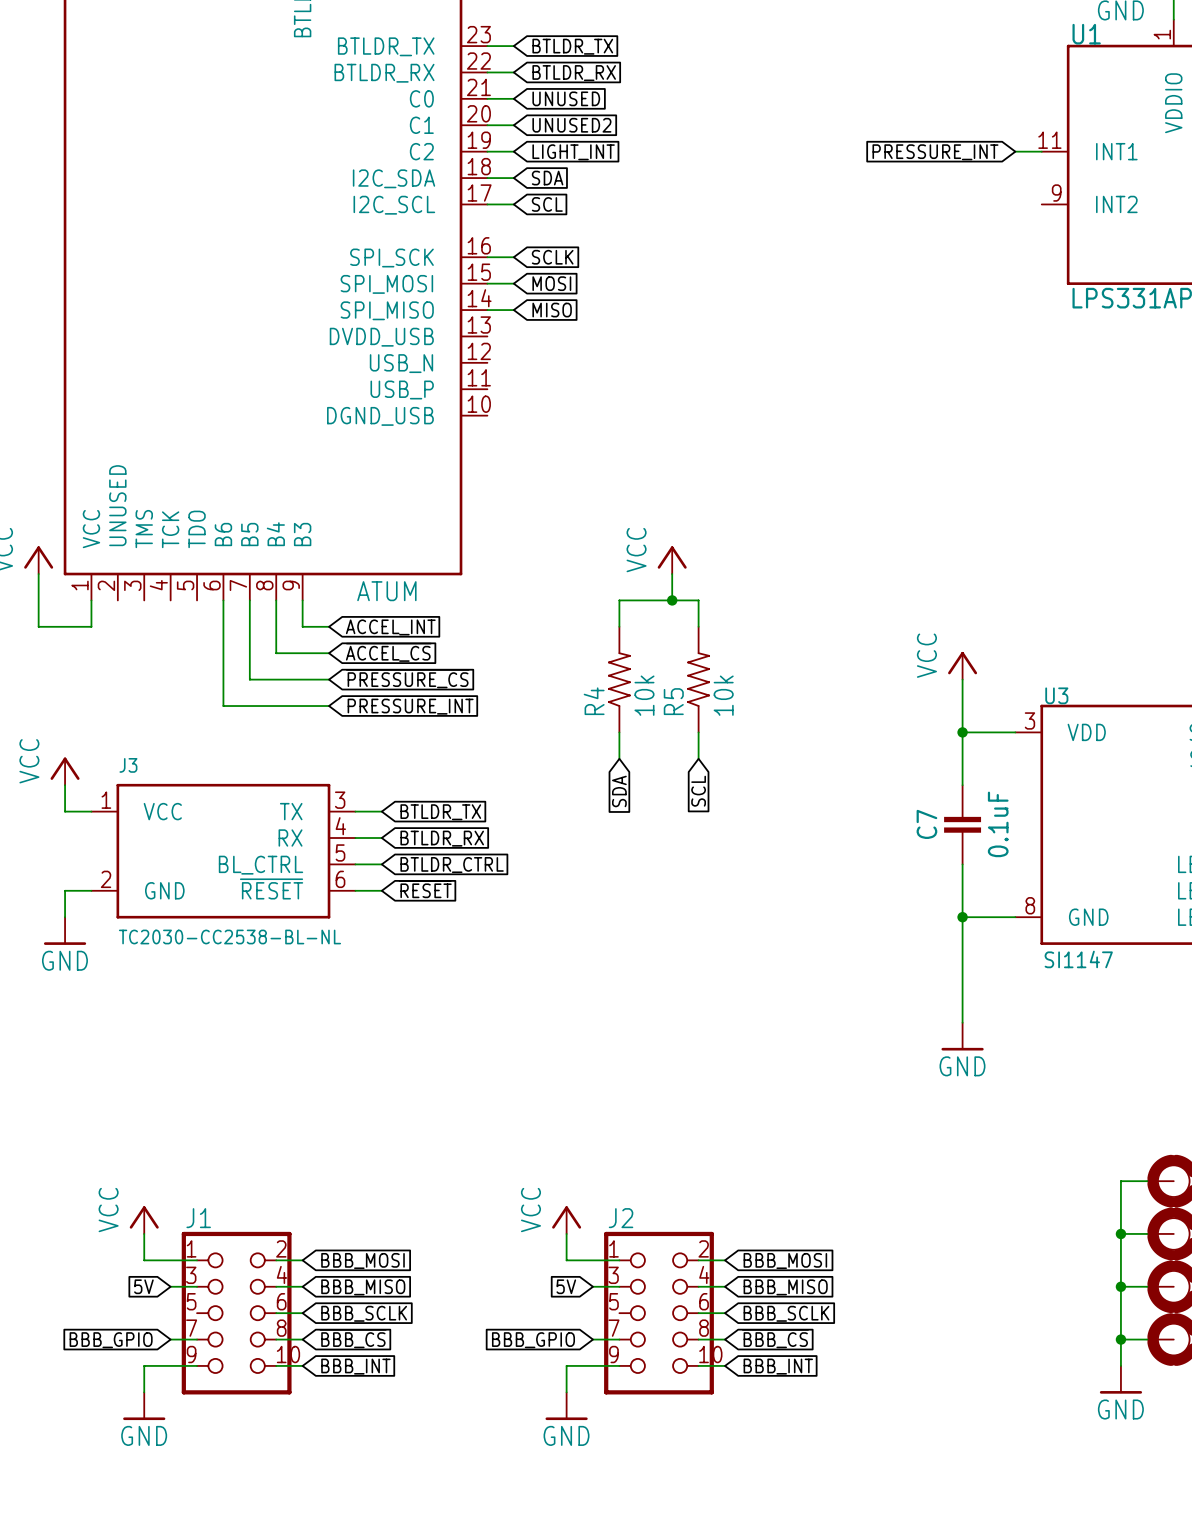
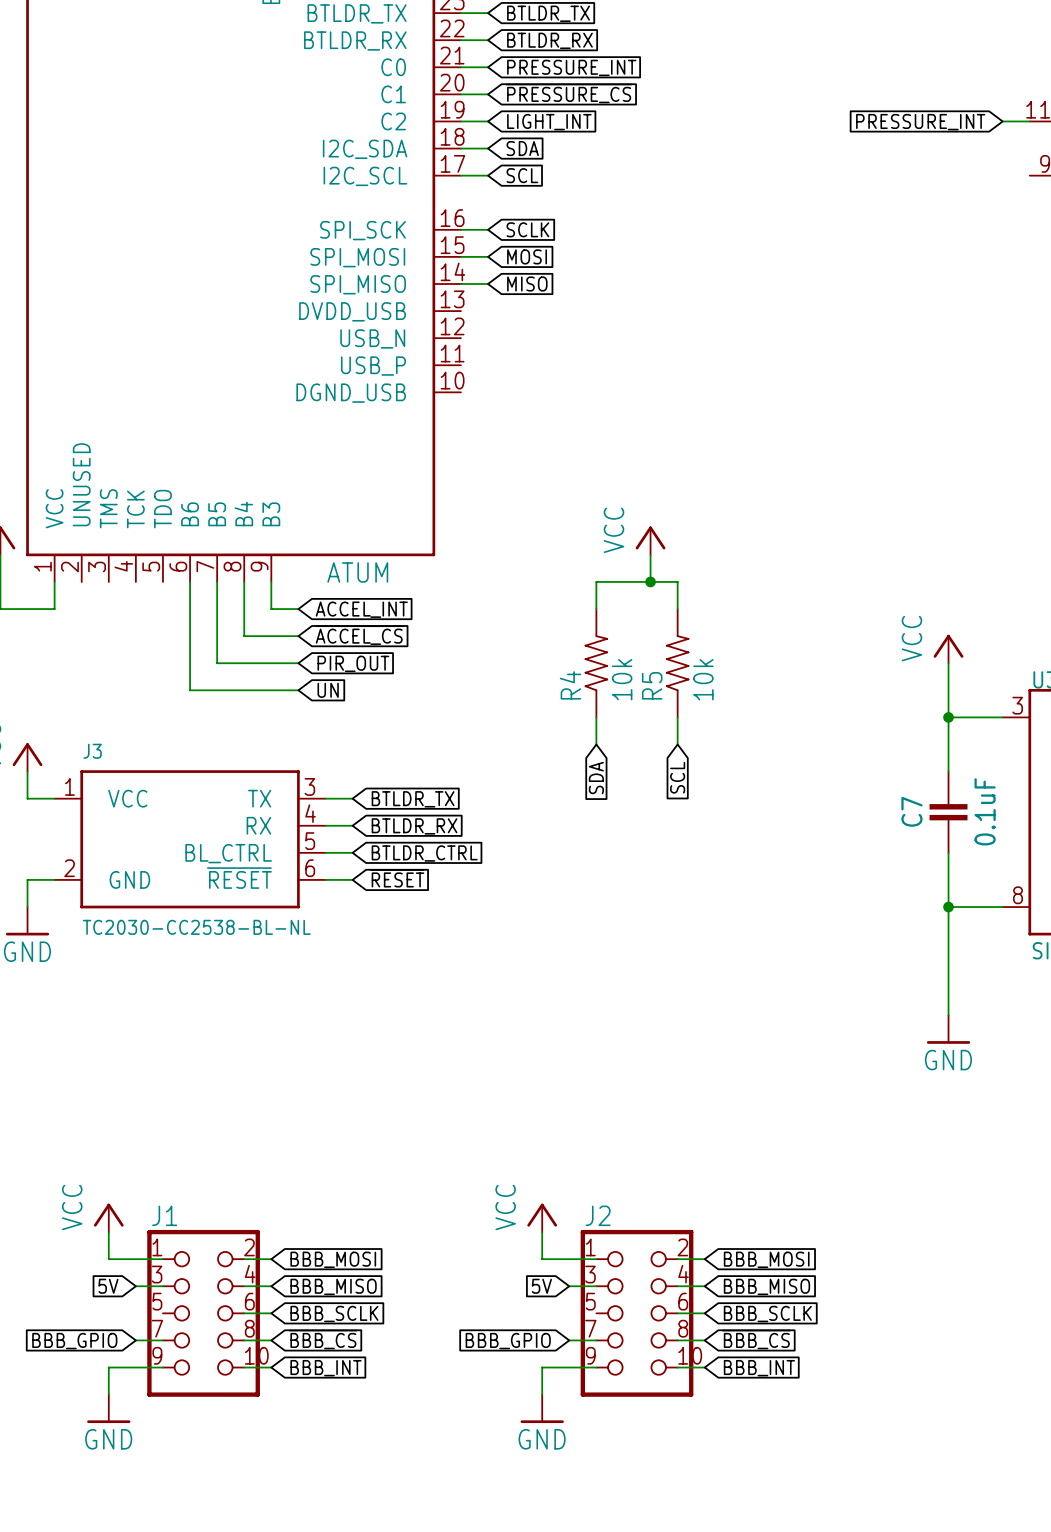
global label: UNUSED (566, 98) -> PRESSURE_INT (571, 67)
global label: UNUSED2 (571, 125) -> ~{PRESSURE_CS} (568, 93)
global label: ~{PRESSURE_CS} (407, 678) -> PIR_OUT (353, 663)
global label: PRESSURE_INT (410, 706) -> UN (328, 690)

